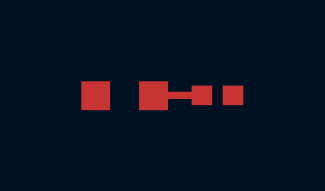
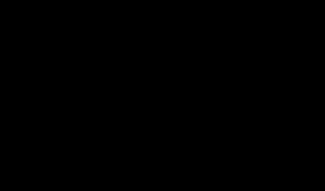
part: (124, 95) -> none
top track: (201, 95) (153, 95) -> none
part: (217, 95) -> none

